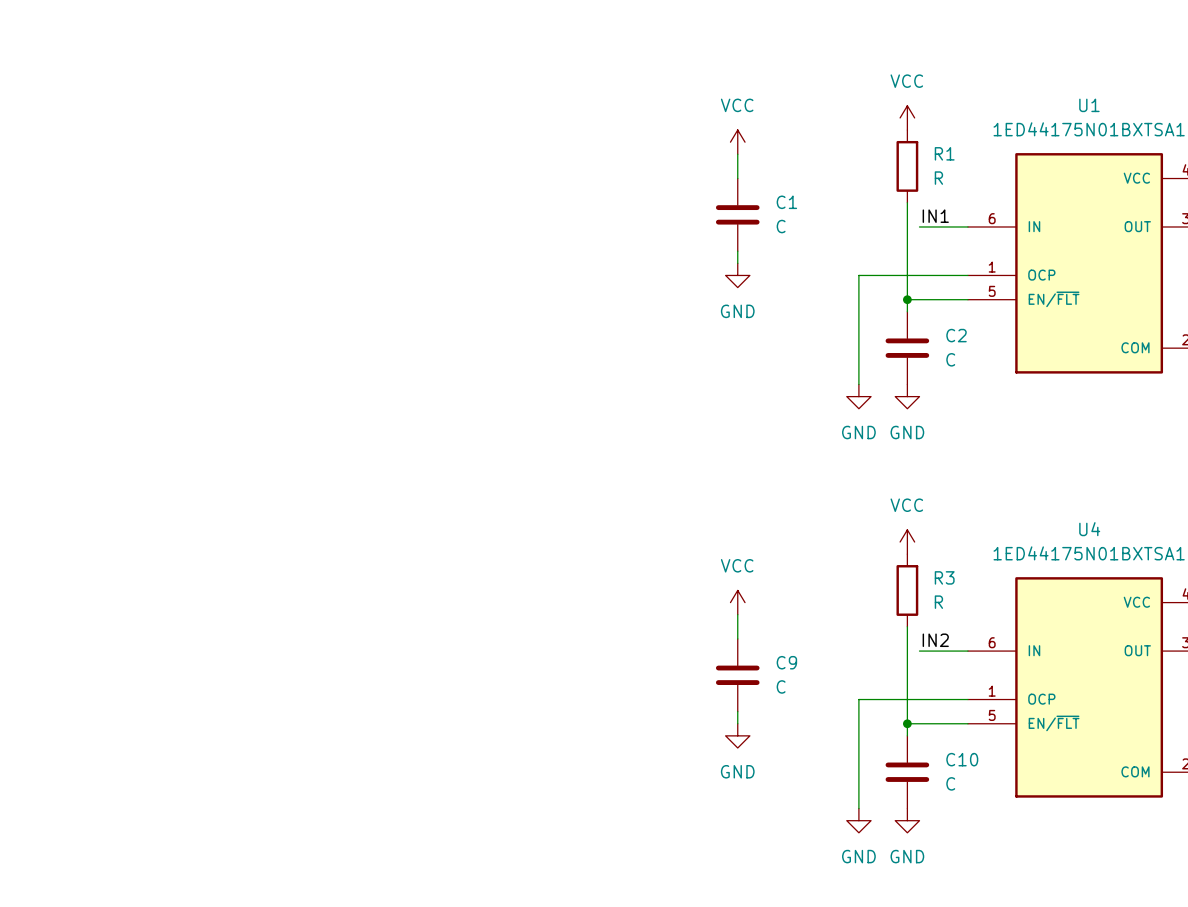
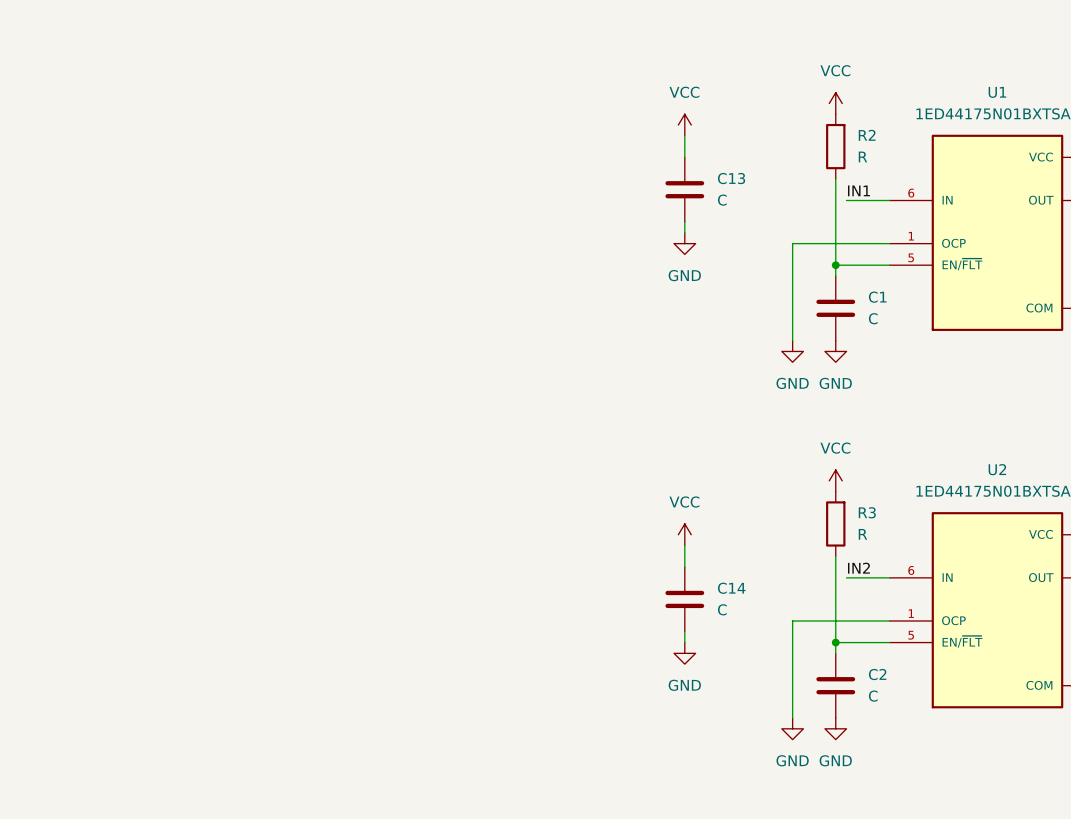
R1 name: R1 (944, 153) -> R2 (867, 135)
C1 name: C1 (786, 202) -> C13 (731, 178)
C2 name: C2 (956, 335) -> C1 (877, 297)
U4 name: U4 (1089, 529) -> U2 (997, 469)
C9 name: C9 (786, 662) -> C14 (731, 588)
C10 name: C10 (962, 759) -> C2 (877, 674)

